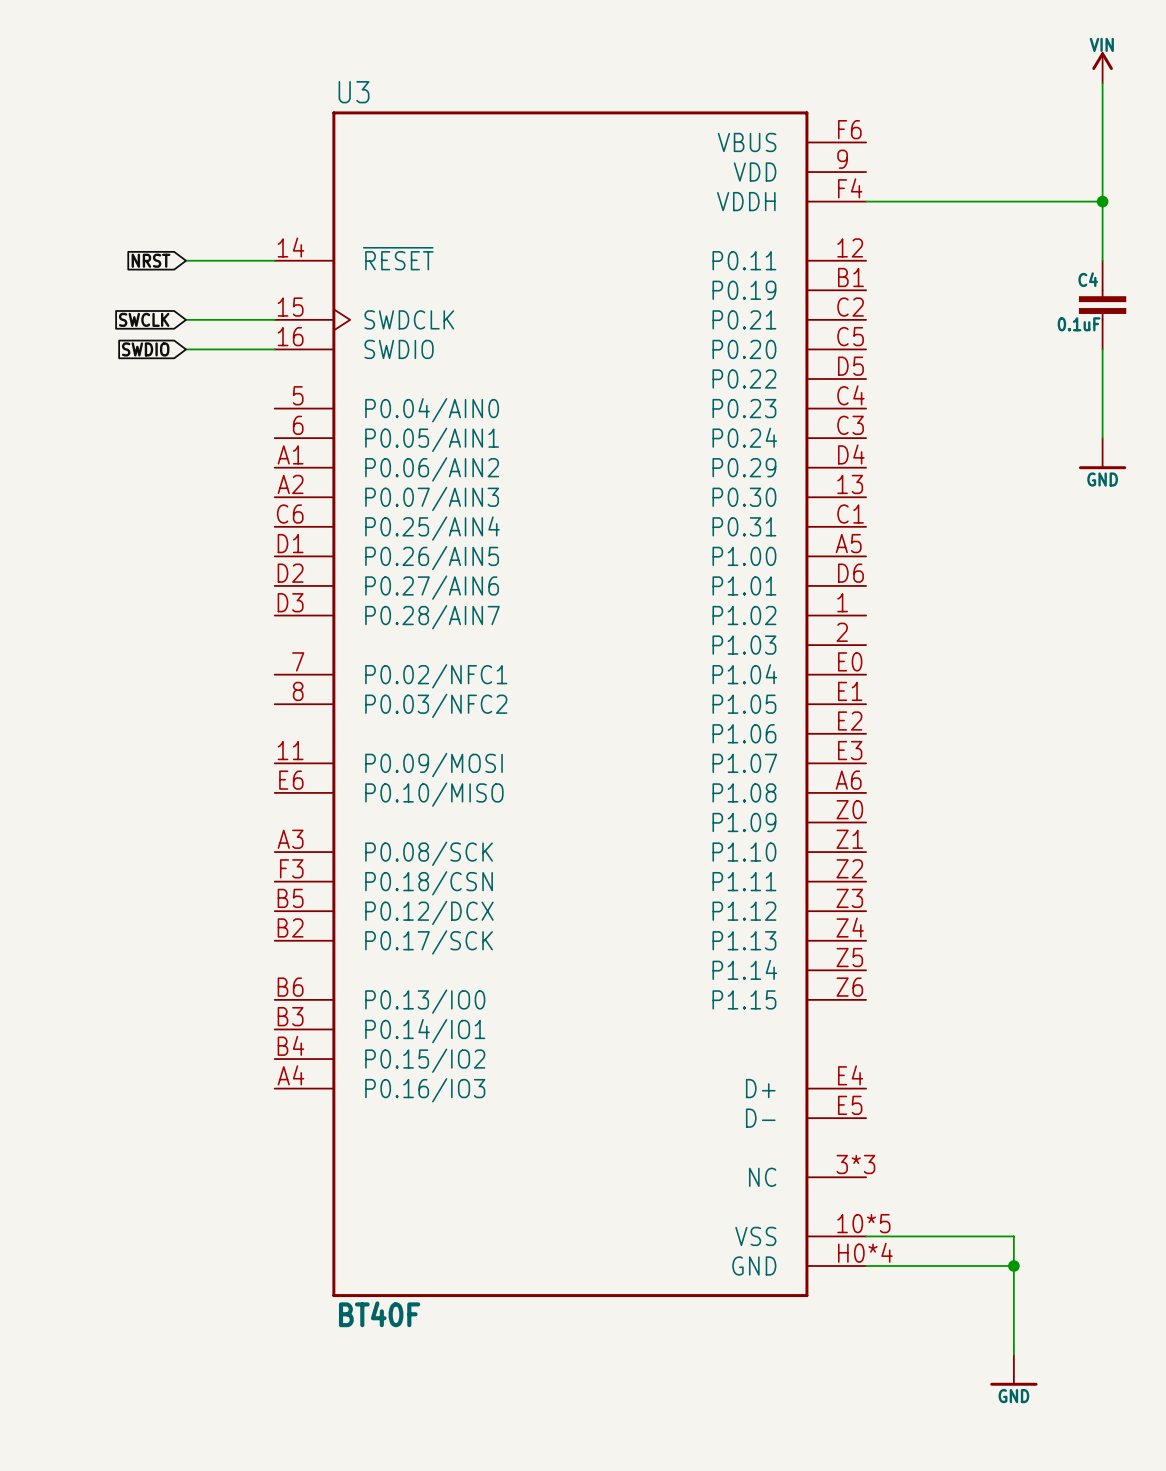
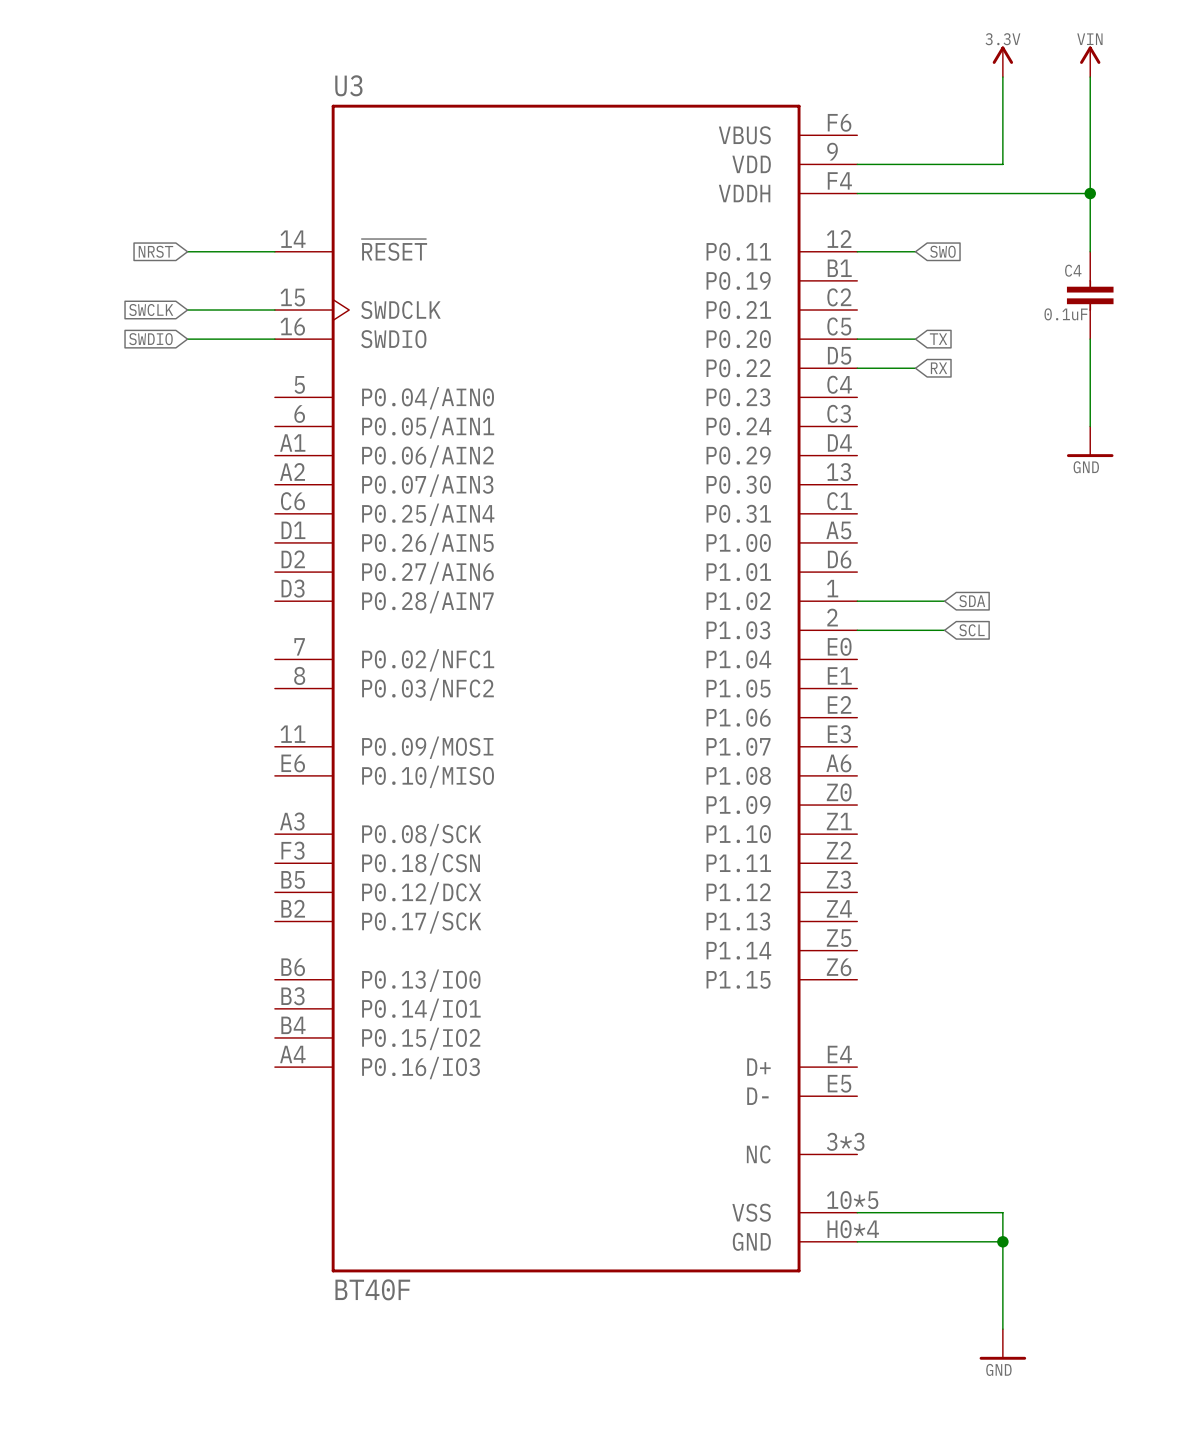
power symbol: none -> 3.3V (1002, 61)
wire: none -> (1002, 77) (1002, 164) (857, 164)
wire: none -> (857, 251) (915, 251)
global label: none -> SWO (942, 251)
wire: none -> (857, 339) (915, 339)
global label: none -> TX (938, 339)
wire: none -> (857, 368) (915, 368)
global label: none -> RX (938, 368)
wire: none -> (857, 601) (944, 601)
global label: none -> SDA (972, 601)
wire: none -> (857, 630) (944, 630)
global label: none -> SCL (971, 630)

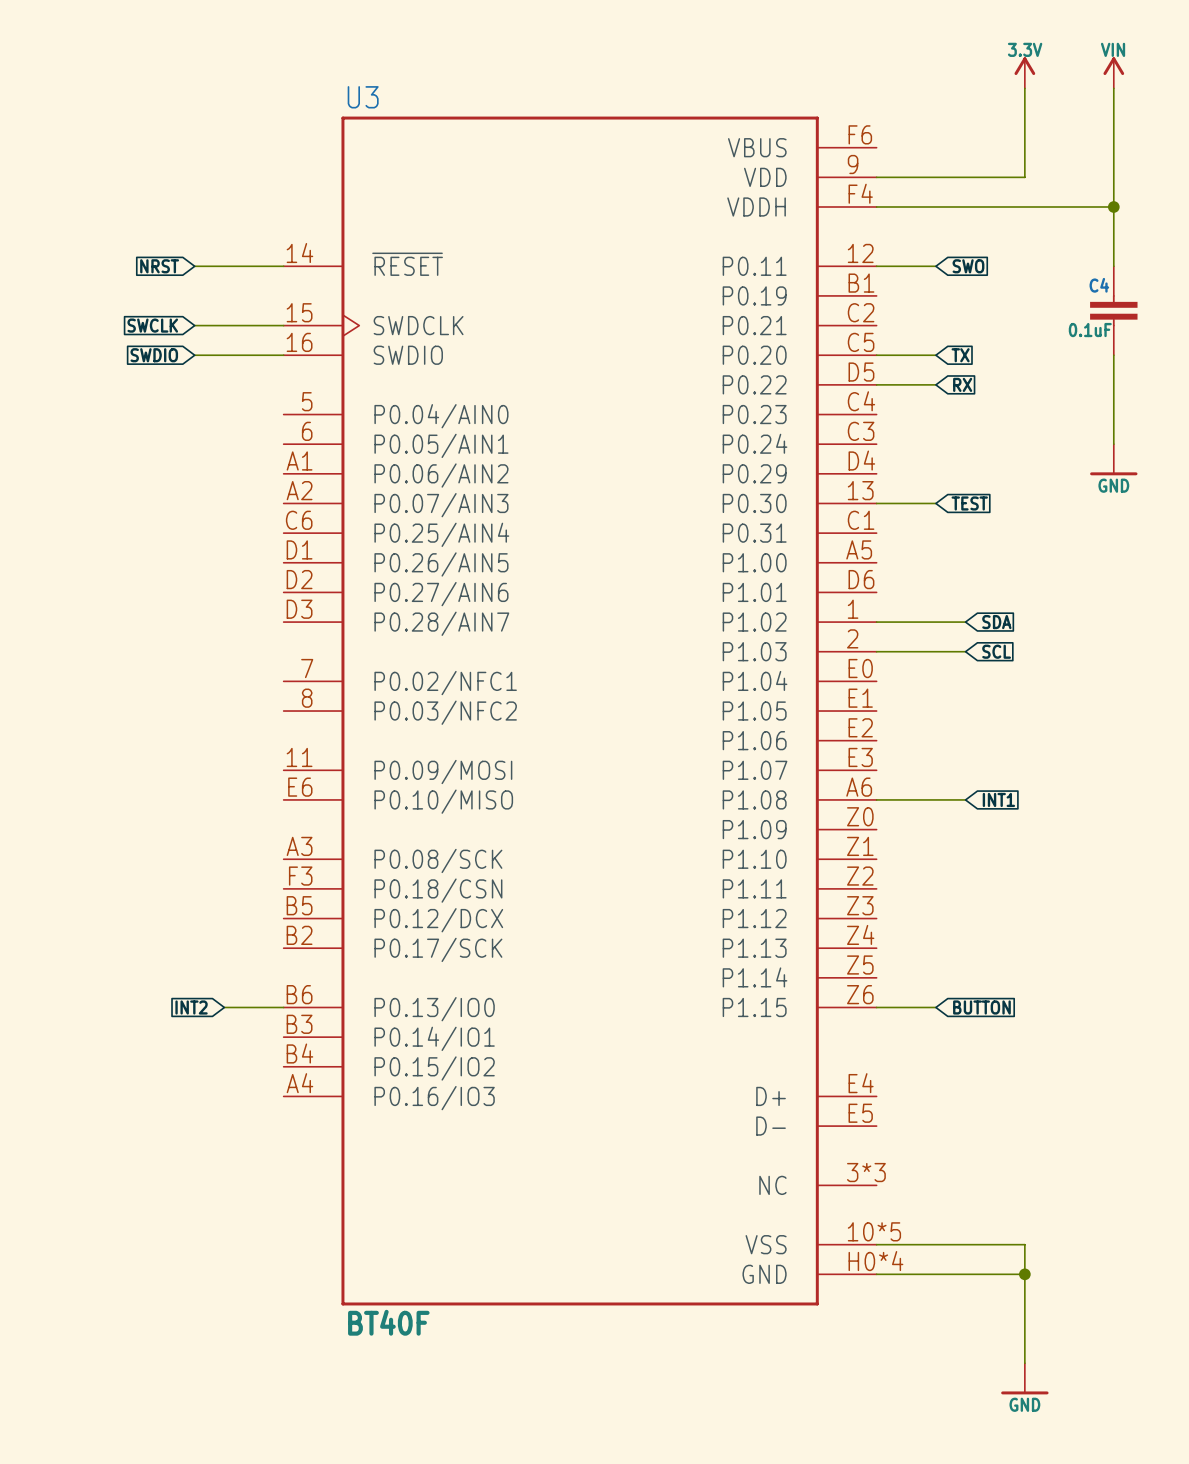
wire: none -> (876, 503) (935, 503)
global label: none -> TEST (969, 503)
wire: none -> (876, 799) (965, 799)
global label: none -> INT1 (998, 799)
global label: none -> INT2 (191, 1007)
wire: none -> (224, 1007) (283, 1007)
wire: none -> (876, 1007) (935, 1007)
global label: none -> BUTTON (981, 1007)

